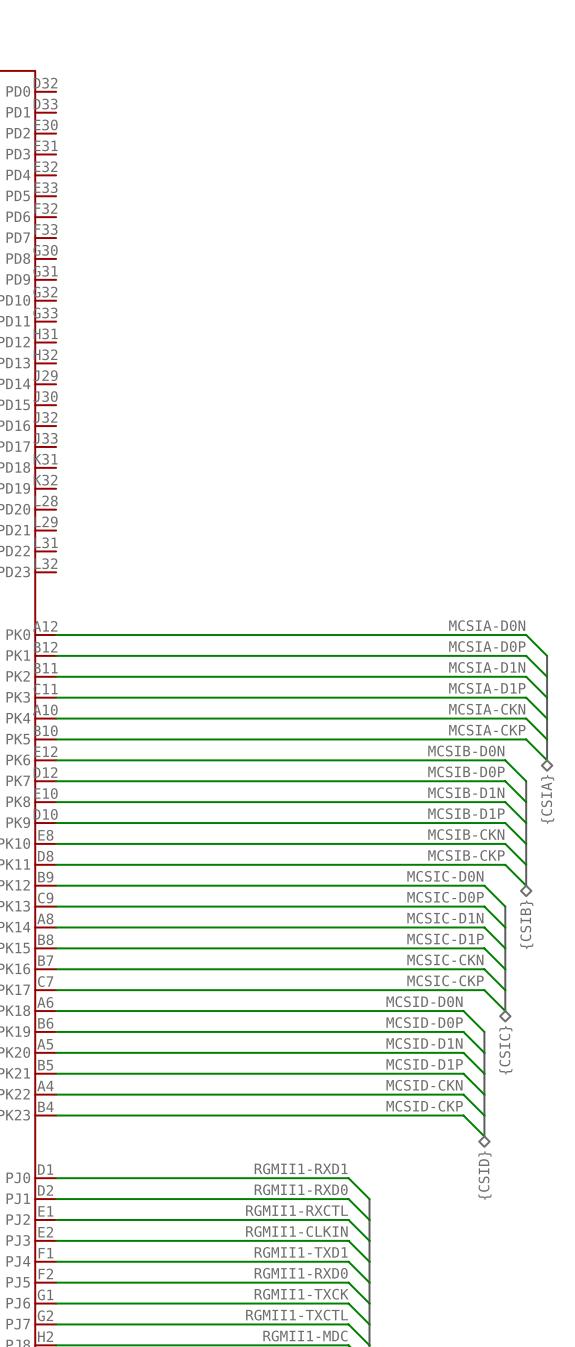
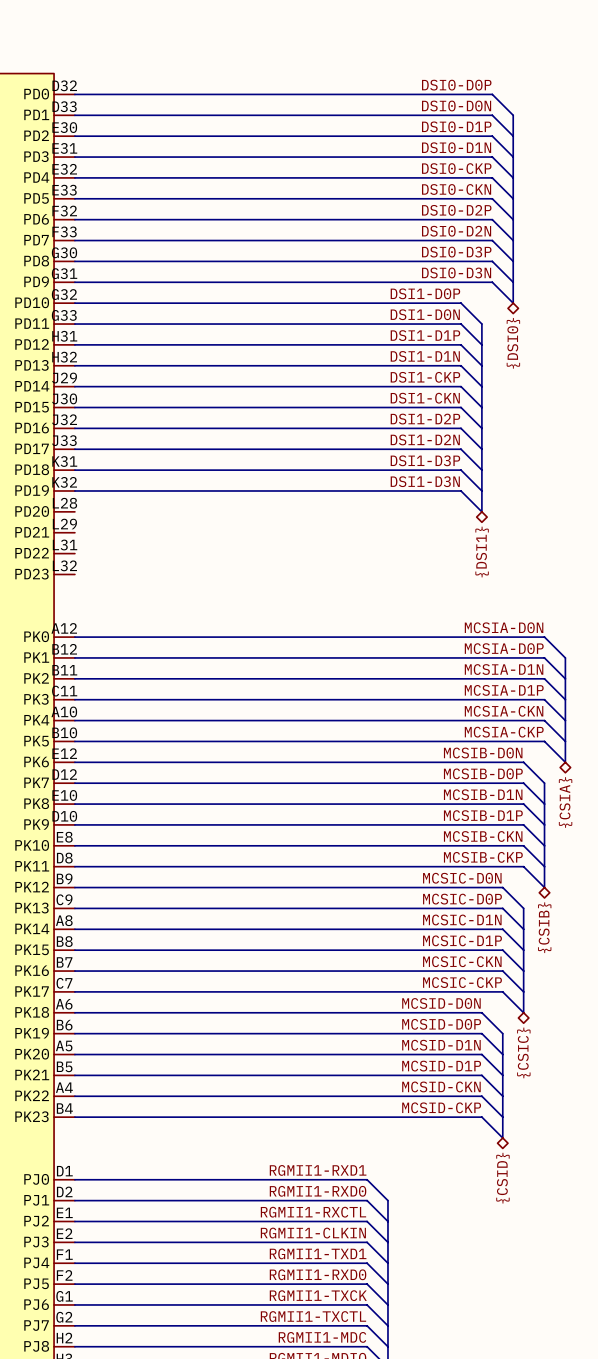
label: none -> DSI0-D0P (456, 85)
wire: none -> (74, 94) (492, 94) (513, 115)
label: none -> DSI0-D0N (456, 105)
wire: none -> (74, 115) (492, 115) (513, 136)
bus: none -> (513, 115) (513, 303)
label: none -> DSI0-D1P (456, 126)
wire: none -> (74, 136) (492, 136) (513, 157)
label: none -> DSI0-D1N (456, 147)
wire: none -> (74, 157) (492, 157) (513, 177)
label: none -> DSI0-CKP (456, 168)
wire: none -> (74, 177) (492, 177) (513, 198)
label: none -> DSI0-CKN (456, 189)
wire: none -> (74, 198) (492, 198) (513, 219)
label: none -> DSI0-D2P (456, 210)
wire: none -> (74, 219) (492, 219) (513, 240)
label: none -> DSI0-D2N (456, 231)
wire: none -> (74, 240) (492, 240) (513, 261)
label: none -> DSI0-D3P (456, 252)
wire: none -> (74, 261) (492, 261) (513, 282)
label: none -> DSI0-D3N (456, 272)
wire: none -> (74, 282) (492, 282) (513, 303)
label: none -> DSI1-D0P (425, 293)
wire: none -> (74, 303) (461, 303) (481, 324)
label: none -> DSI1-D0N (425, 314)
wire: none -> (74, 324) (461, 324) (481, 344)
bus: none -> (481, 324) (481, 511)
label: none -> DSI1-D1P (425, 335)
hierarchical label: none -> {DSI0} (513, 343)
wire: none -> (74, 344) (461, 344) (481, 365)
label: none -> DSI1-D1N (425, 356)
wire: none -> (74, 365) (461, 365) (481, 386)
label: none -> DSI1-CKP (425, 377)
wire: none -> (74, 386) (461, 386) (481, 407)
label: none -> DSI1-CKN (425, 398)
wire: none -> (74, 407) (461, 407) (481, 428)
label: none -> DSI1-D2P (425, 419)
wire: none -> (74, 428) (461, 428) (481, 449)
label: none -> DSI1-D2N (425, 439)
wire: none -> (74, 449) (461, 449) (481, 470)
label: none -> DSI1-D3P (425, 460)
wire: none -> (74, 470) (461, 470) (481, 490)
label: none -> DSI1-D3N (425, 481)
wire: none -> (74, 490) (461, 490) (481, 511)
hierarchical label: none -> {DSI1} (482, 552)

